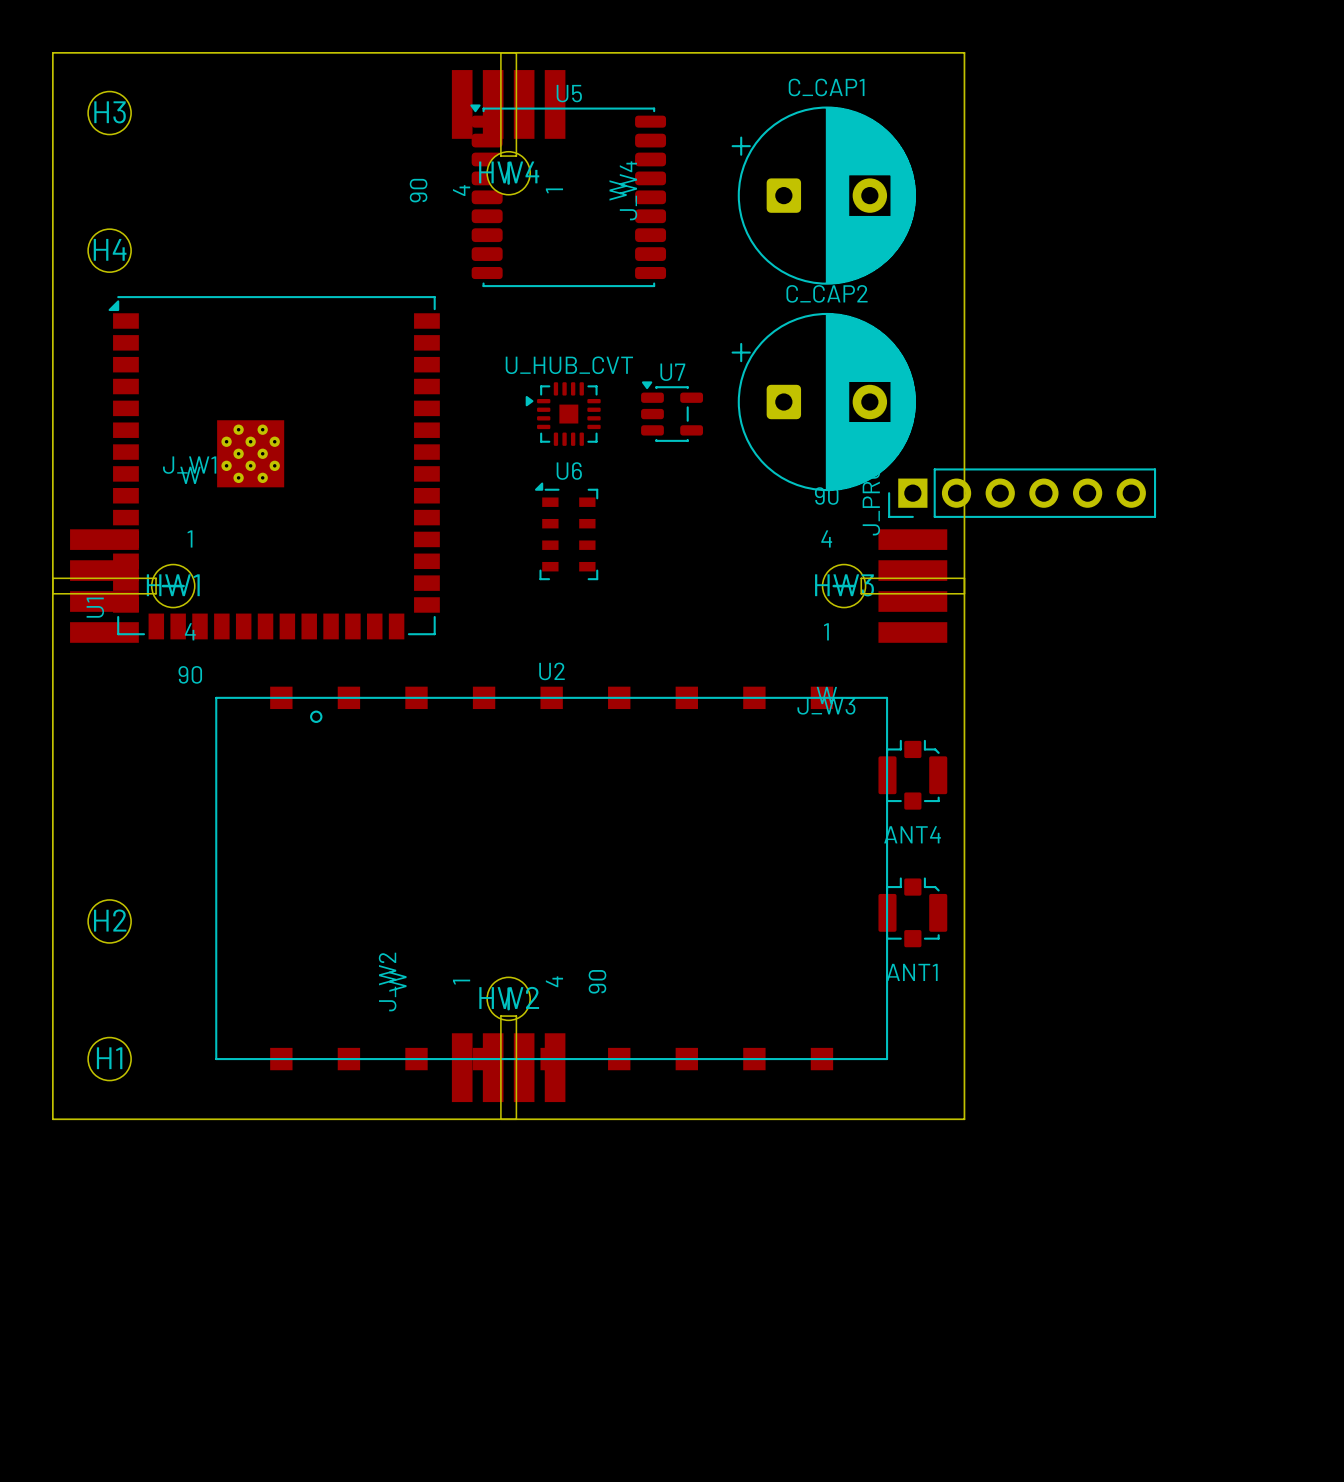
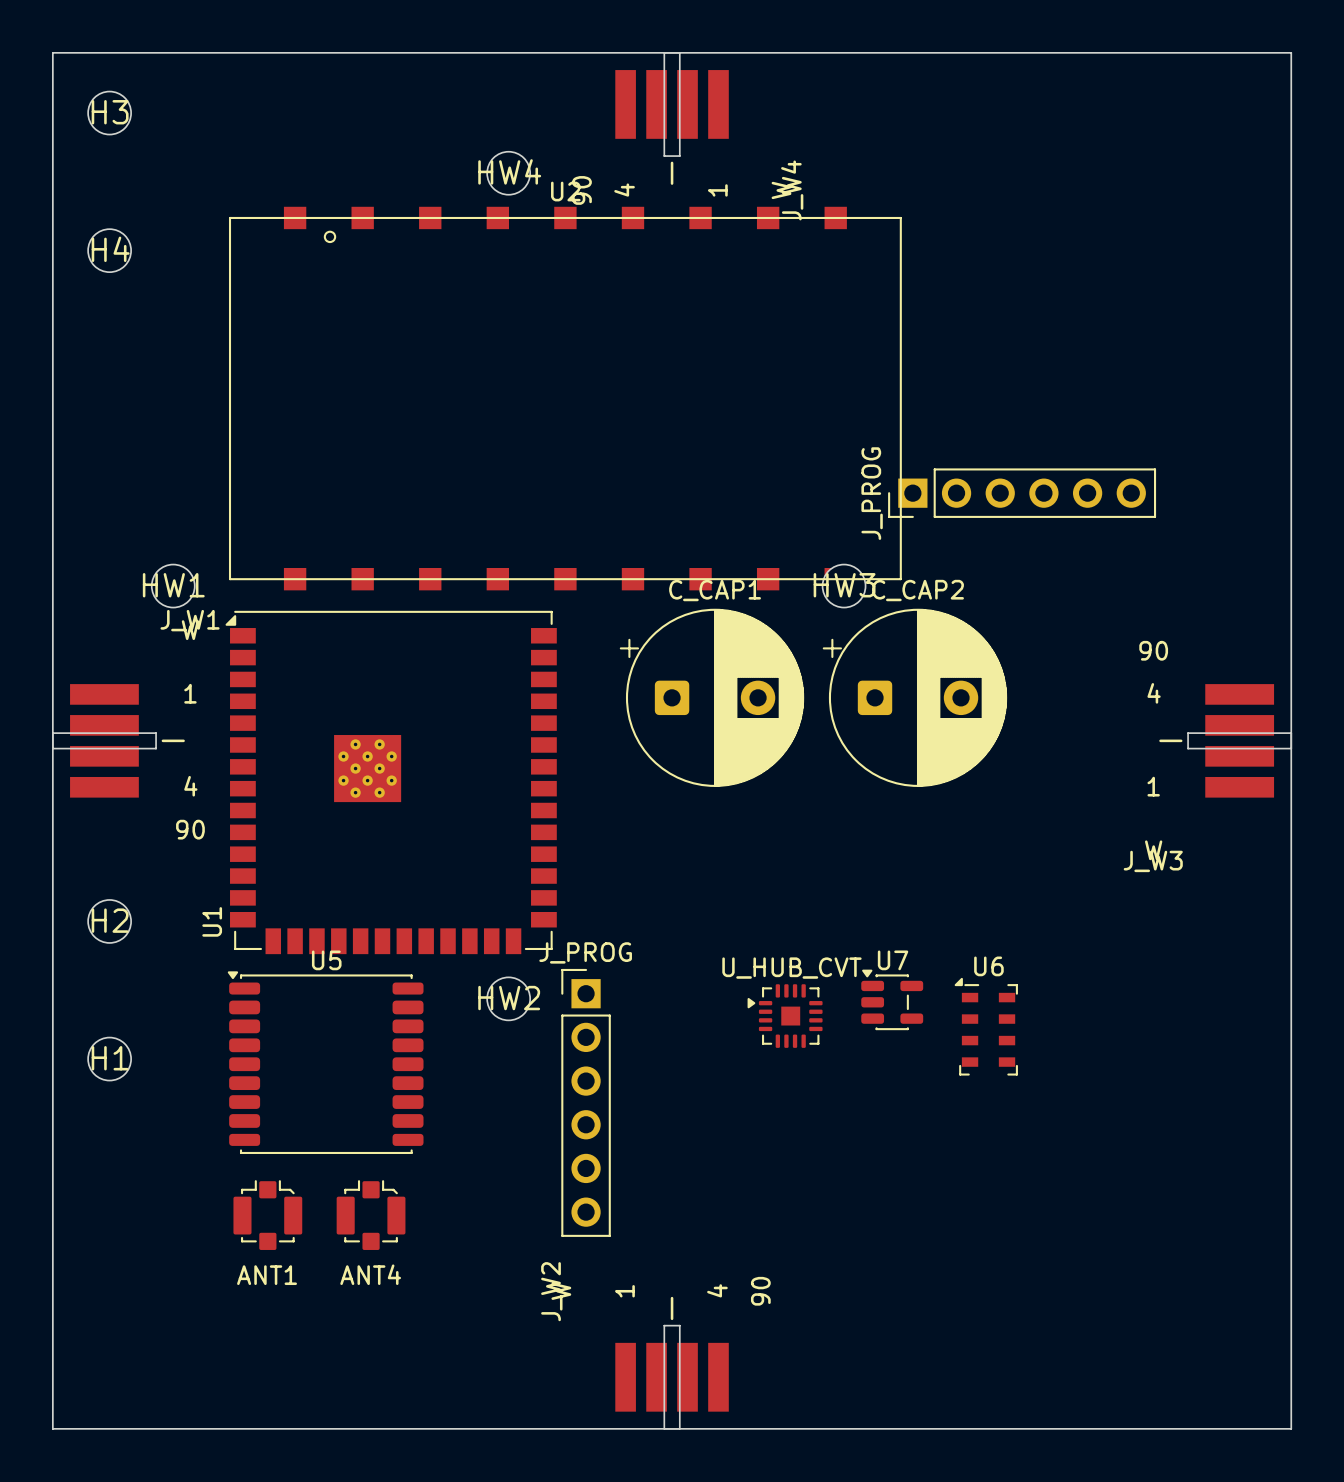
board edge: (964, 52) (964, 1119) (52, 1119) -> (964, 52) (1291, 52) (1291, 1428) (52, 1428) (52, 1119)
J_W4 position: (508, 118) -> (672, 118)
U5 position: (568, 195) -> (325, 1062)
C_CAP1 position: (823, 195) -> (711, 697)
C_CAP2 position: (823, 402) -> (914, 697)
U7 position: (672, 411) -> (892, 999)
U_HUB_CVT: (563, 414) -> none
U1 position: (274, 467) -> (391, 782)
U6 position: (566, 531) -> (986, 1026)
J_W1 position: (118, 586) -> (118, 740)
J_W3 position: (898, 586) -> (1225, 740)
ANT4 position: (912, 774) -> (371, 1215)
U2 position: (551, 878) -> (565, 398)
ANT1 position: (912, 912) -> (267, 1215)
U_HUB_CVT: none -> (785, 1016)
J_W2 position: (508, 1053) -> (672, 1363)
J_PROG: none -> (586, 1102)

